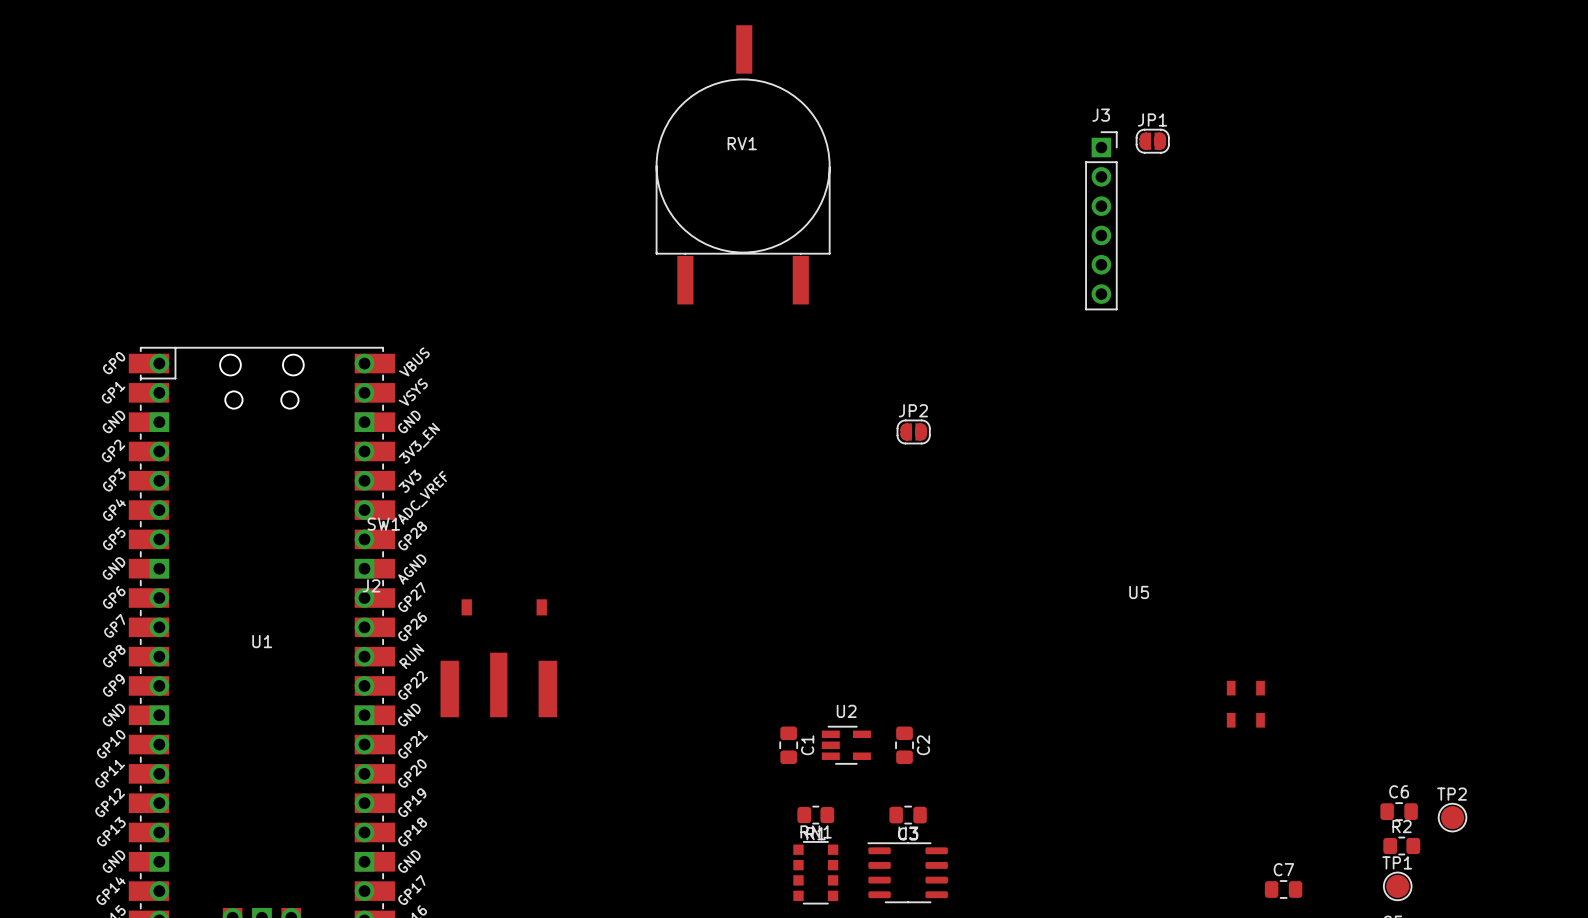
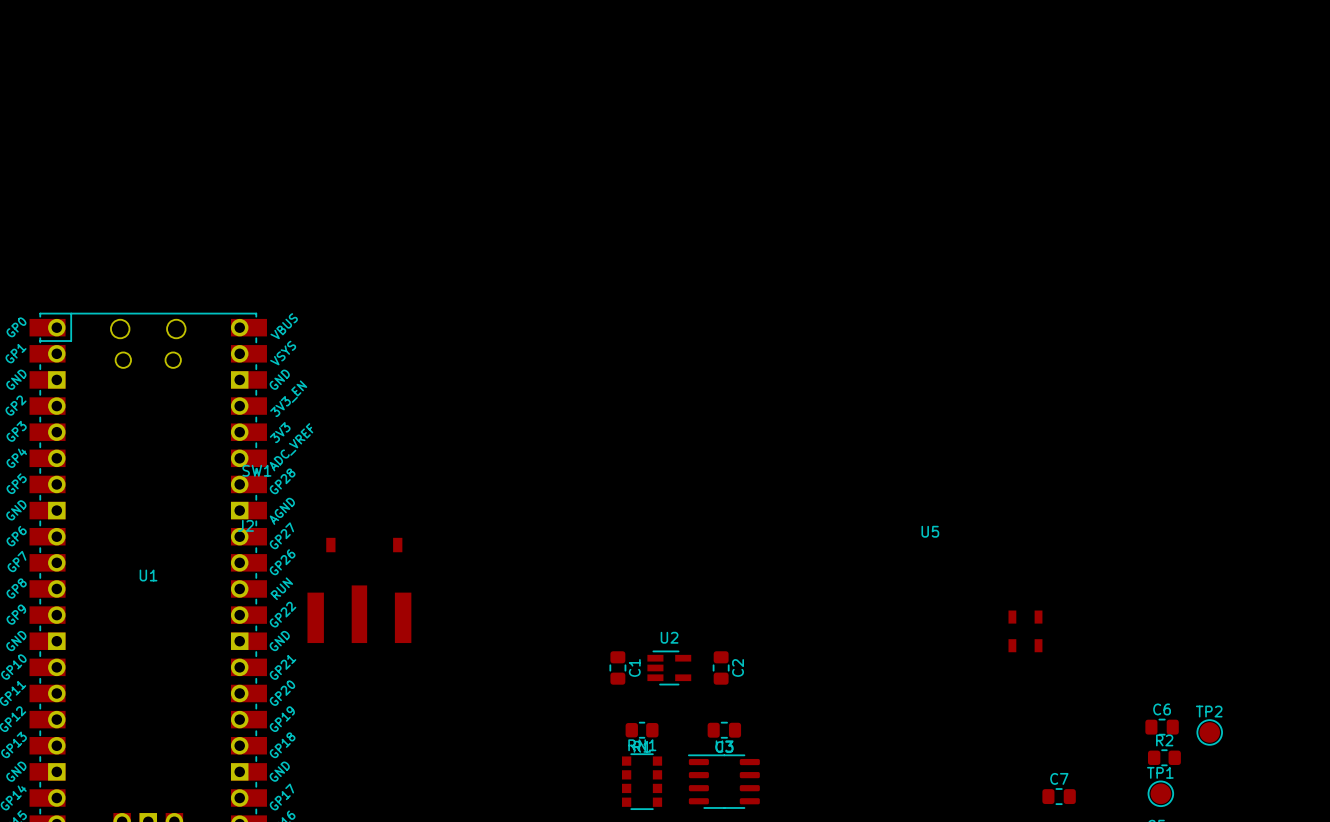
JP1: (1152, 141) -> none
RV1: (743, 164) -> none
J3: (1101, 220) -> none
JP2: (913, 431) -> none

